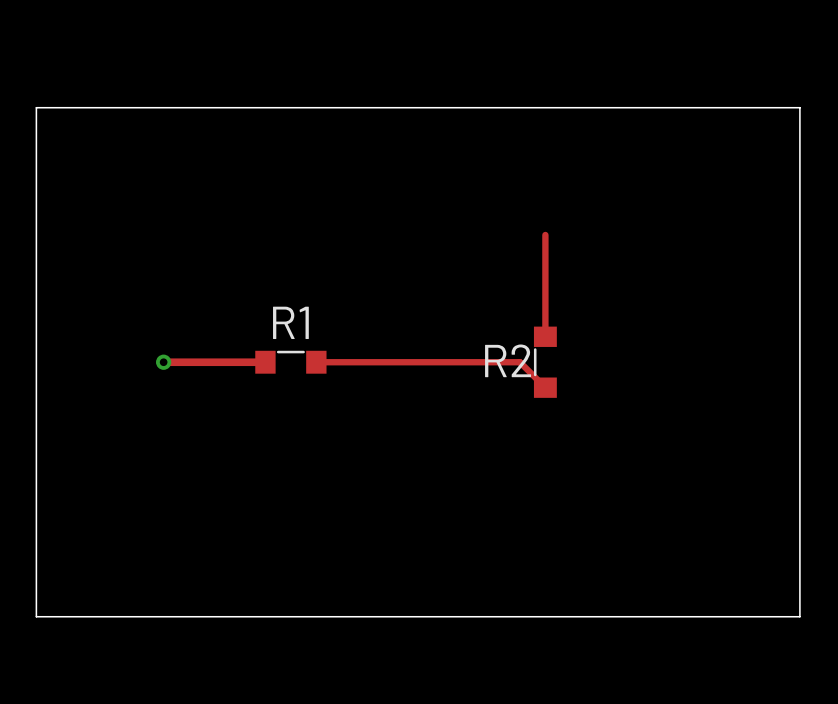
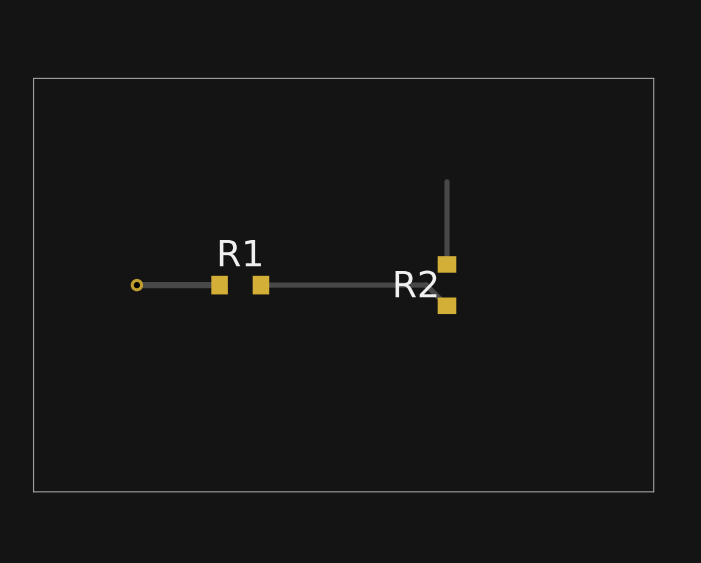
R2 footprint: [533, 326, 557, 398] -> [437, 256, 457, 315]
R1 footprint: [255, 350, 327, 374] -> [211, 275, 270, 295]

